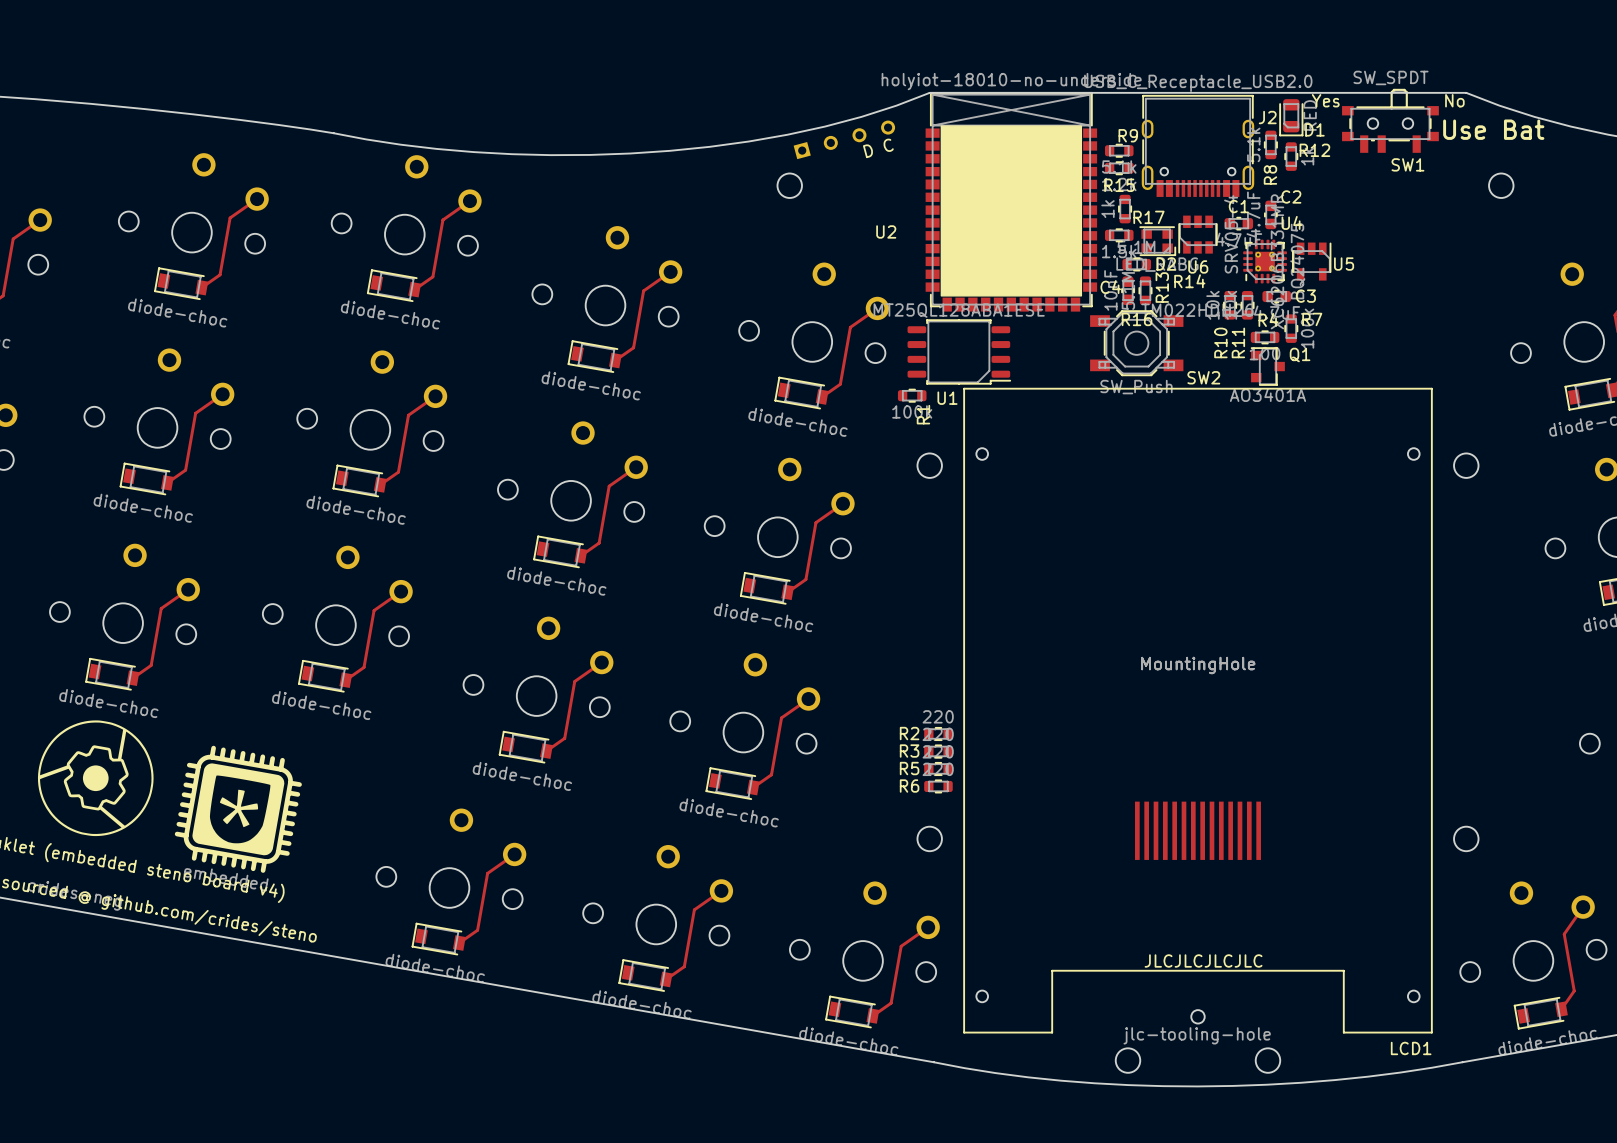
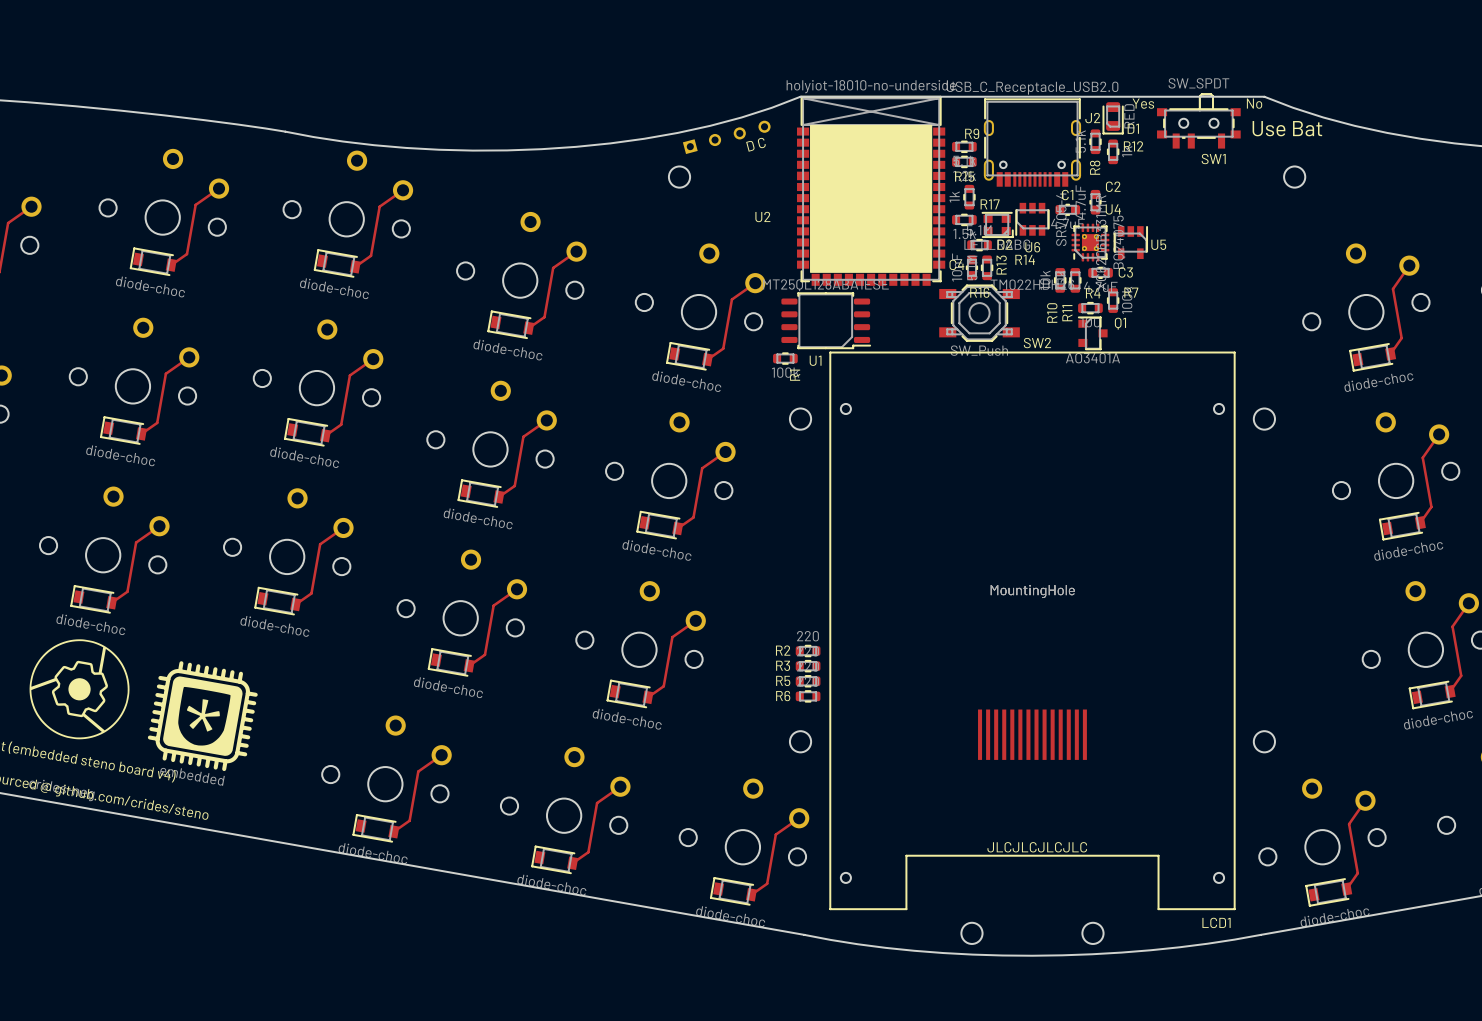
part: jlc-tooling-hole (1197, 1016) -> none

